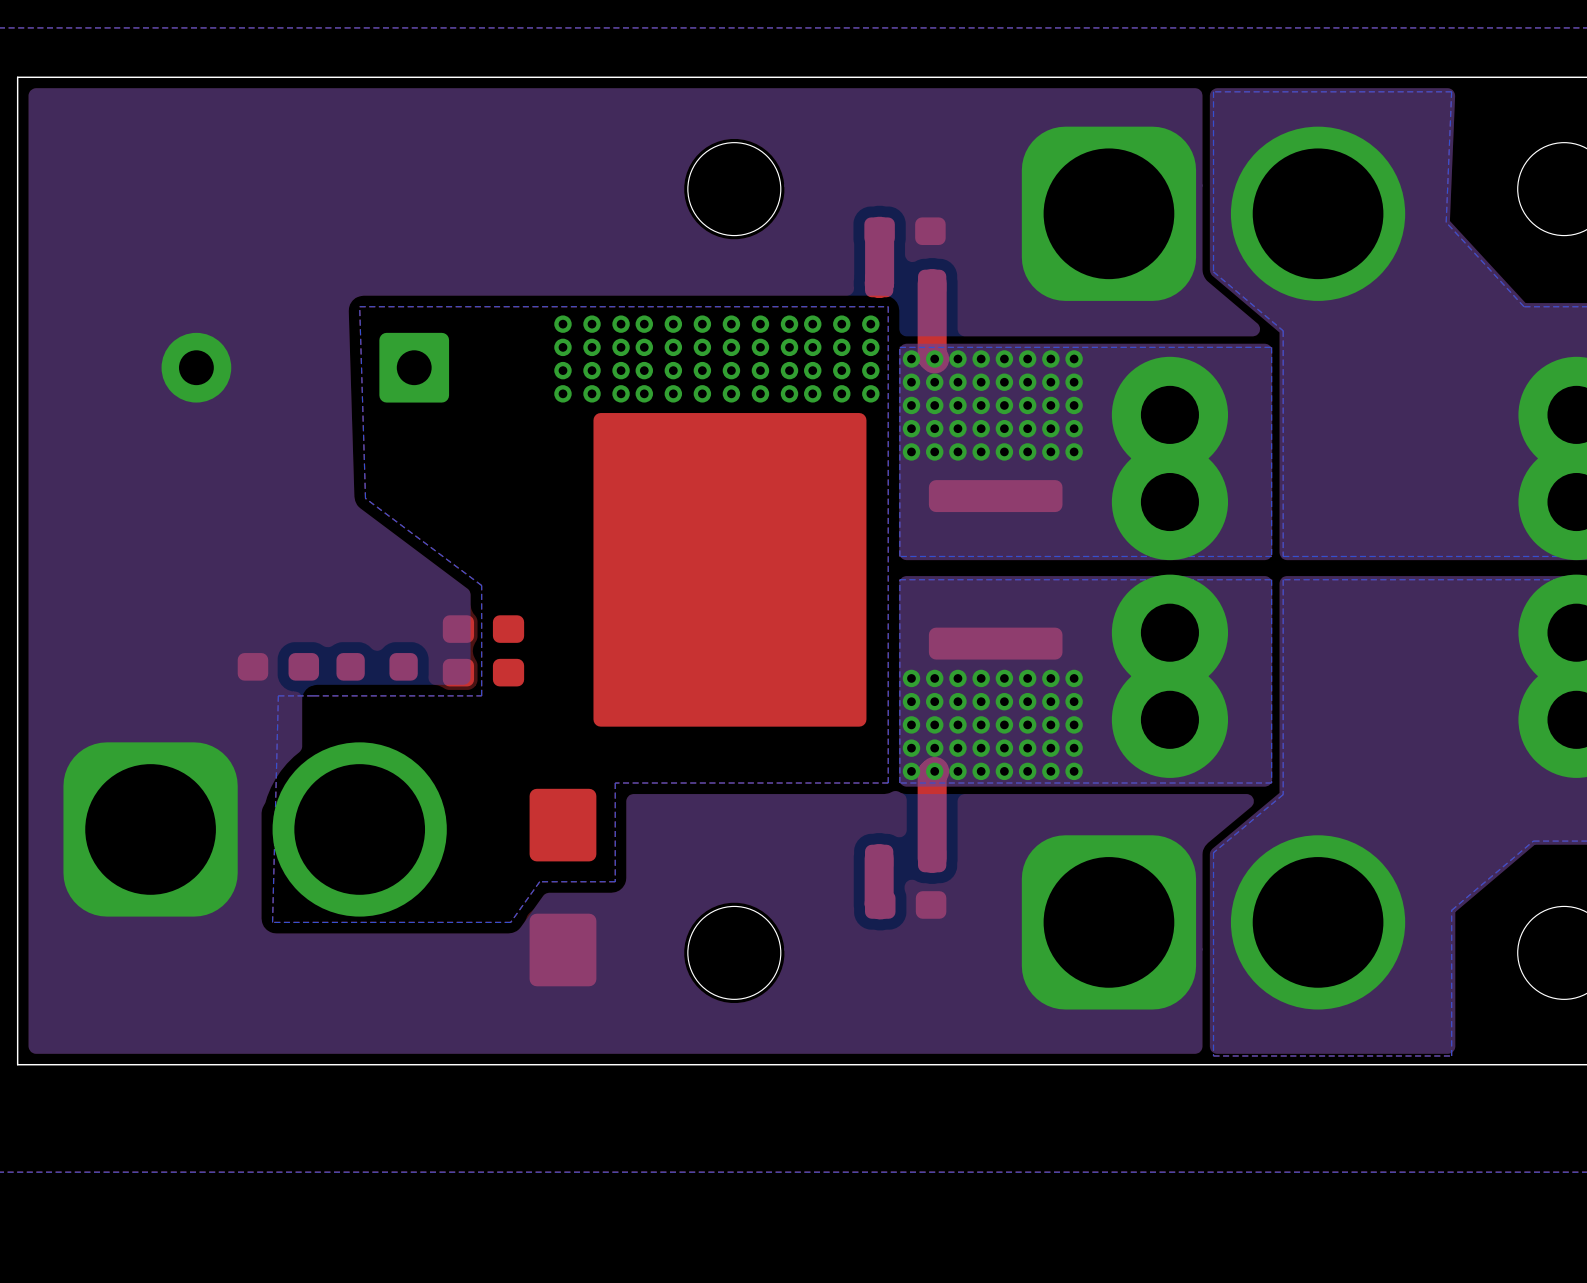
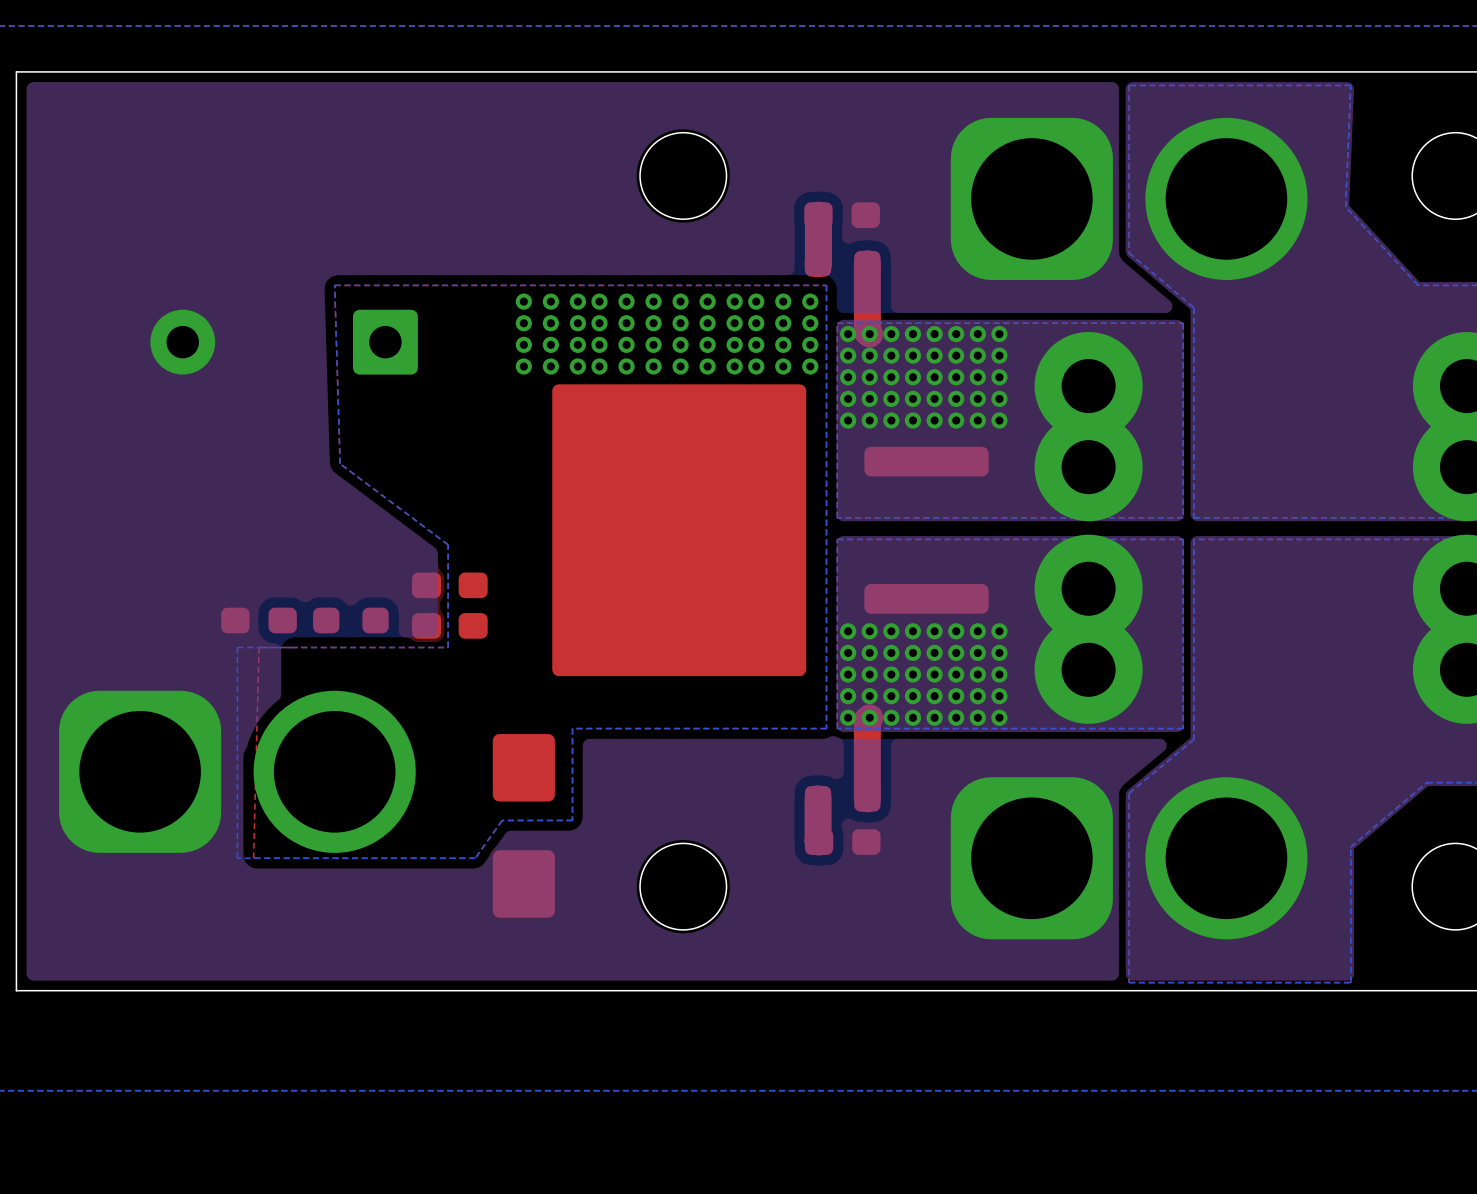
bottom zone outline: (278, 695) (272, 922) -> (259, 647) (237, 647) (237, 858) (253, 858)

